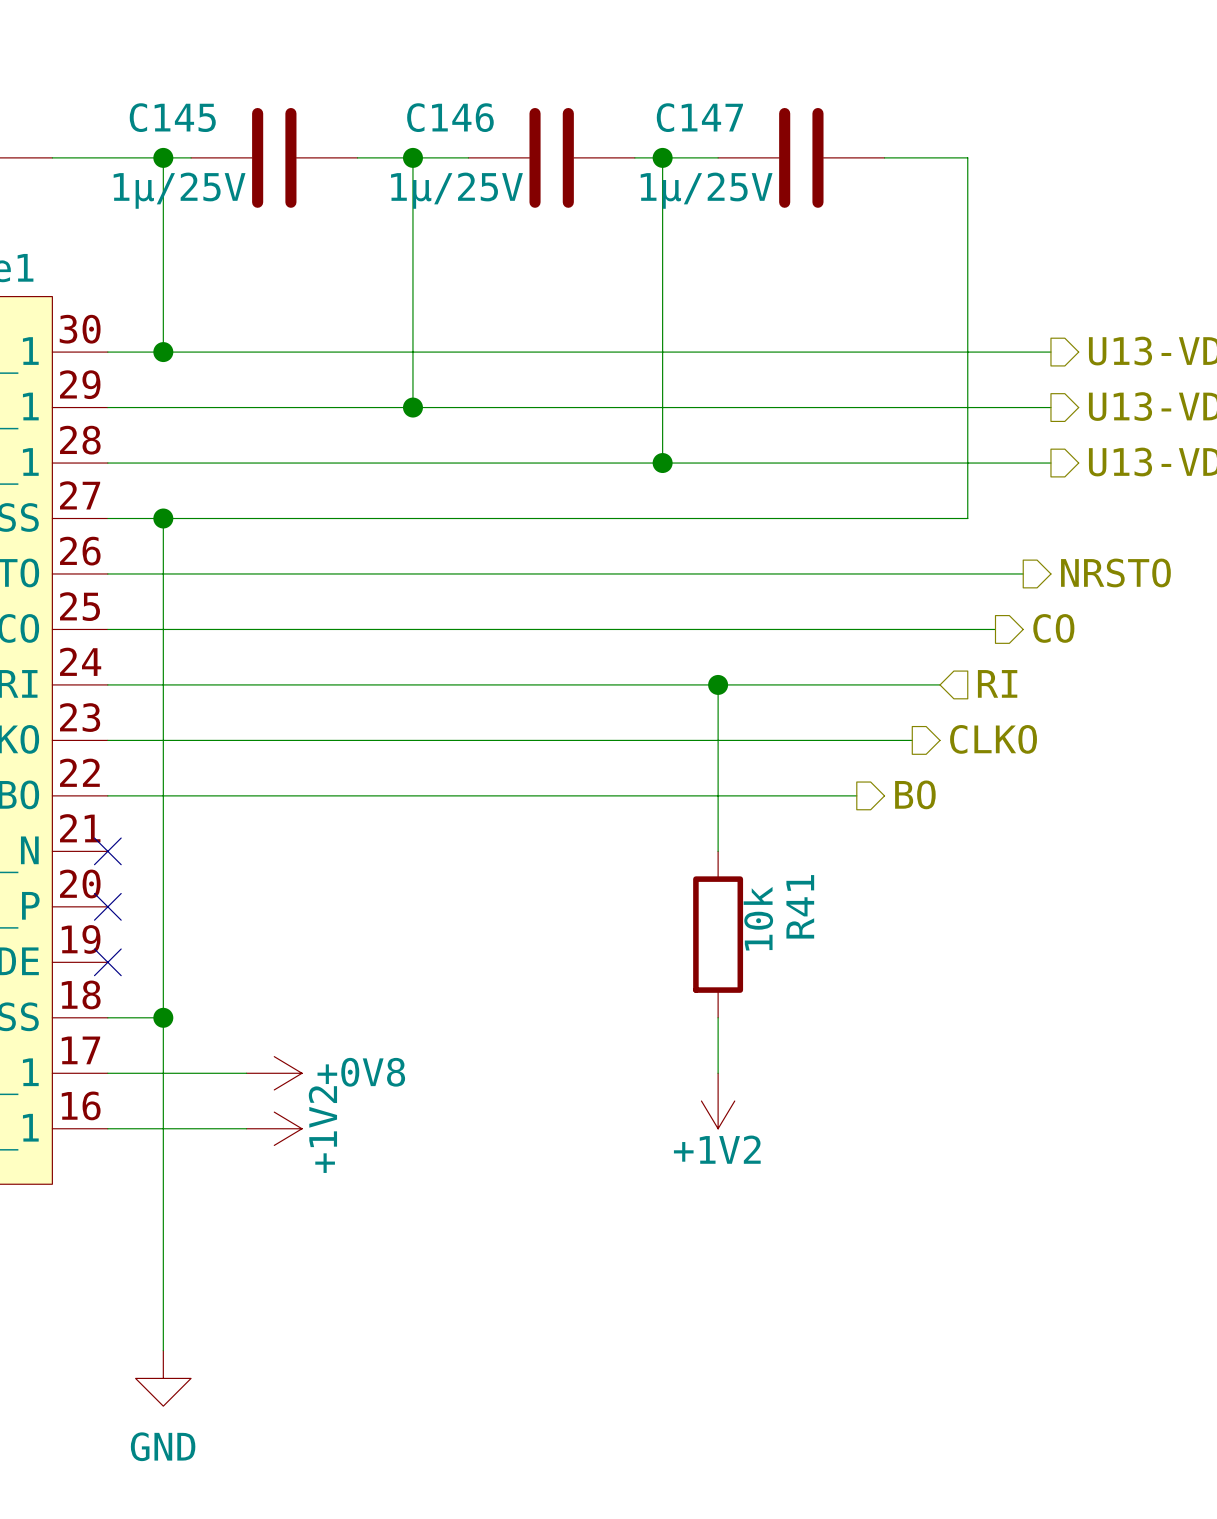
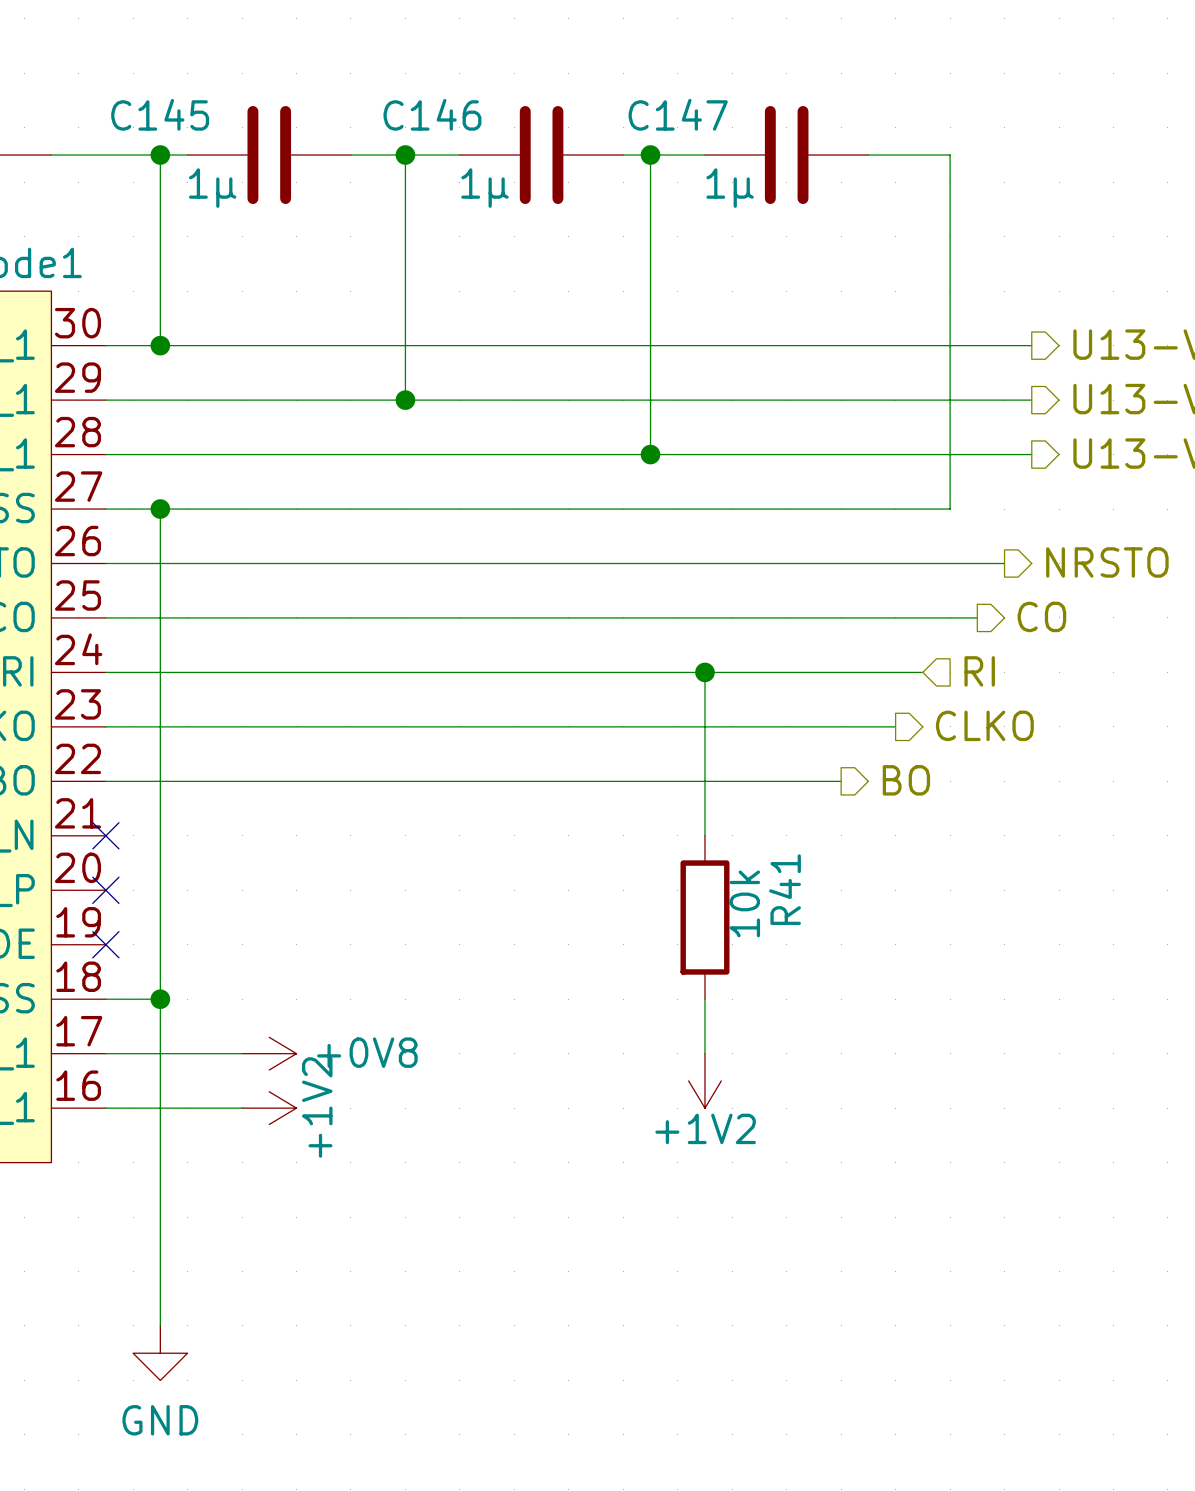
C145 value: 1µ/25V (179, 190) -> 1µ (212, 188)
C146 value: 1µ/25V (456, 190) -> 1µ (484, 188)
C147 value: 1µ/25V (706, 190) -> 1µ (730, 188)

